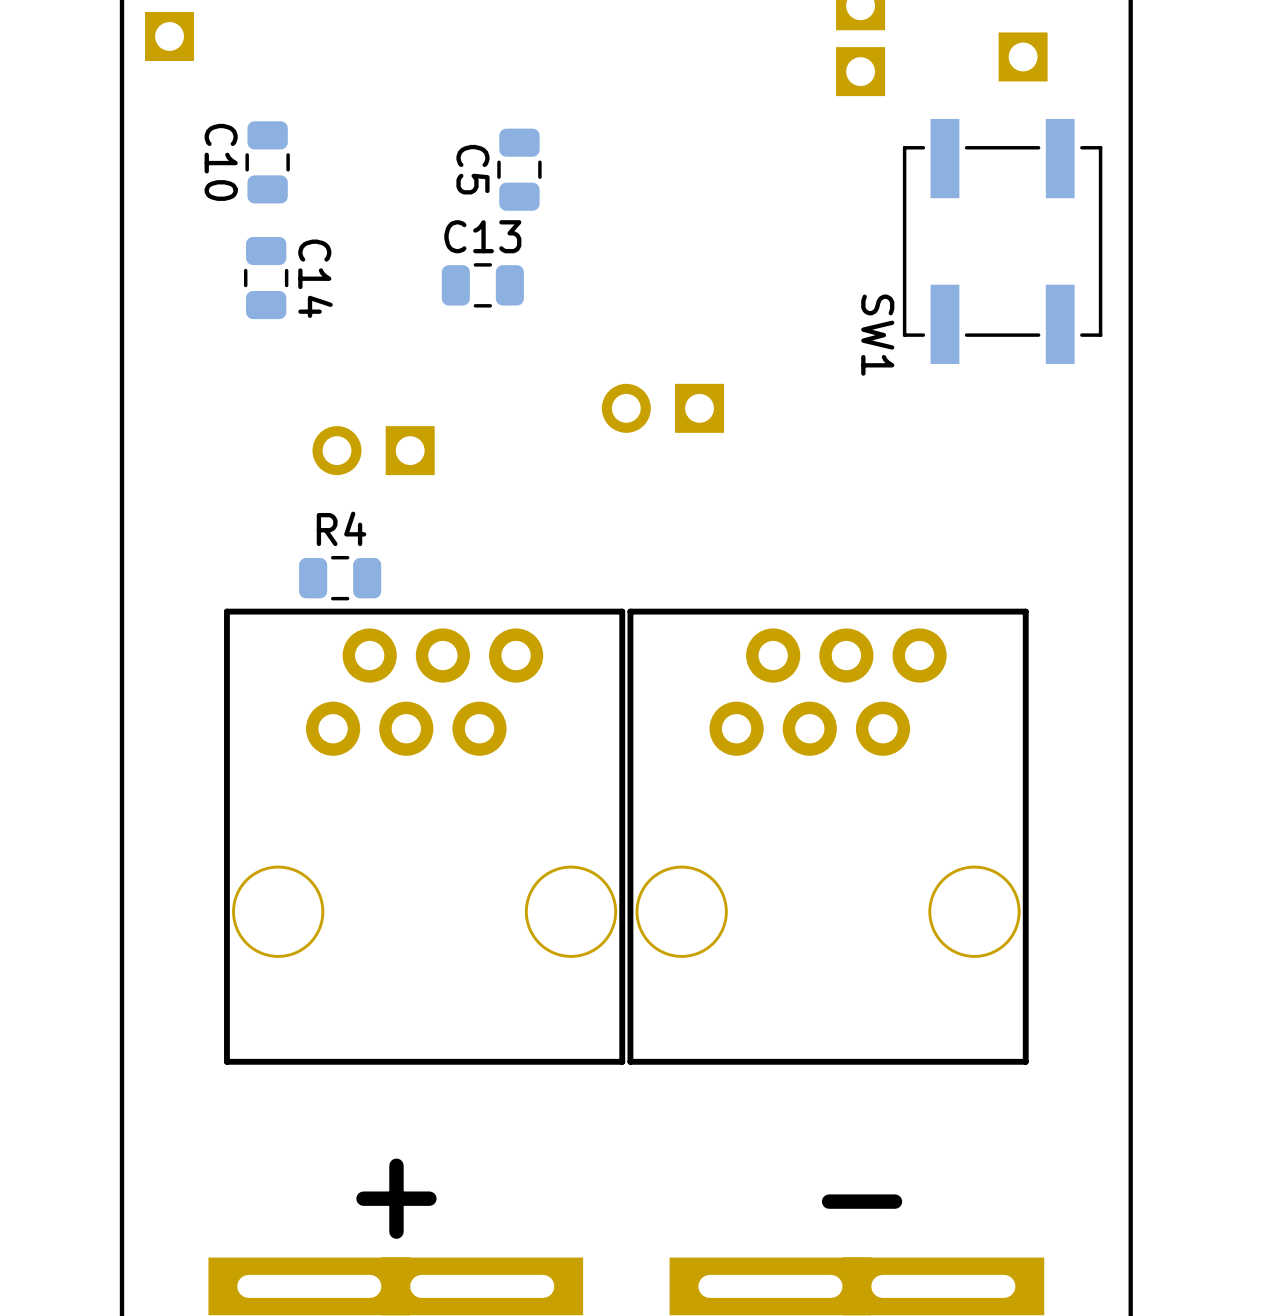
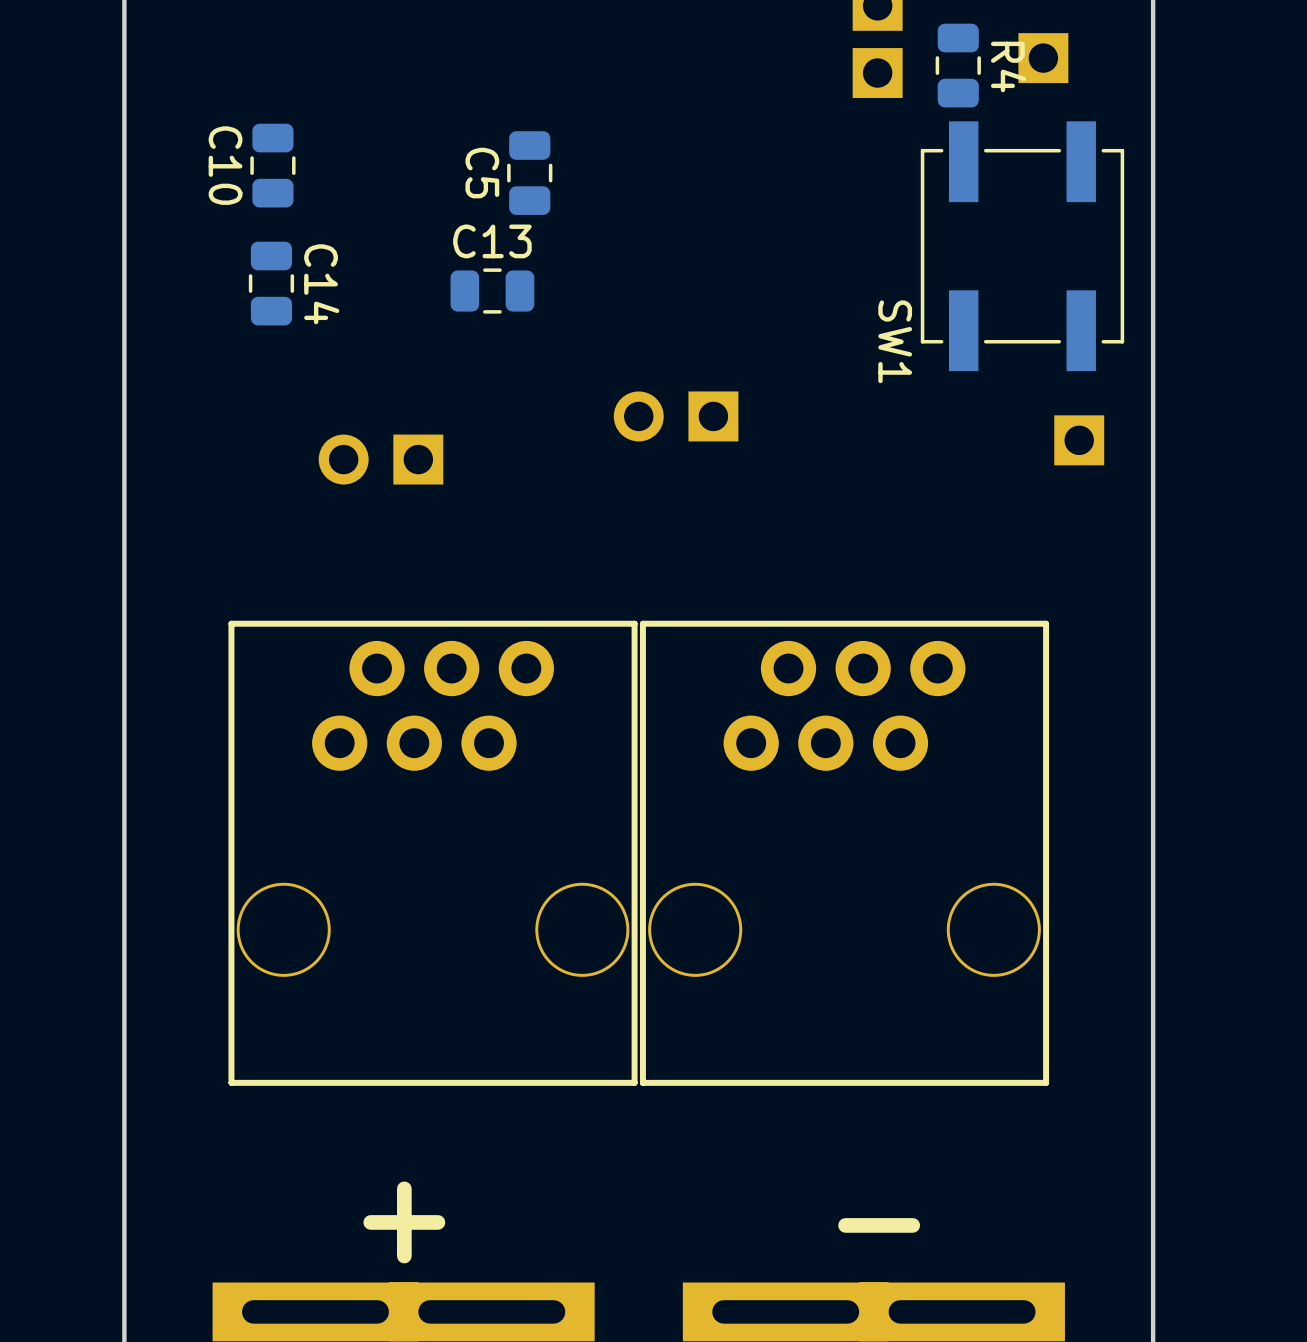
part: (169, 36) -> none
part: none -> (1079, 440)
R4 rotation: 0° (340, 578) -> 90° clockwise (958, 65)
R4 position: (340, 578) -> (958, 65)

